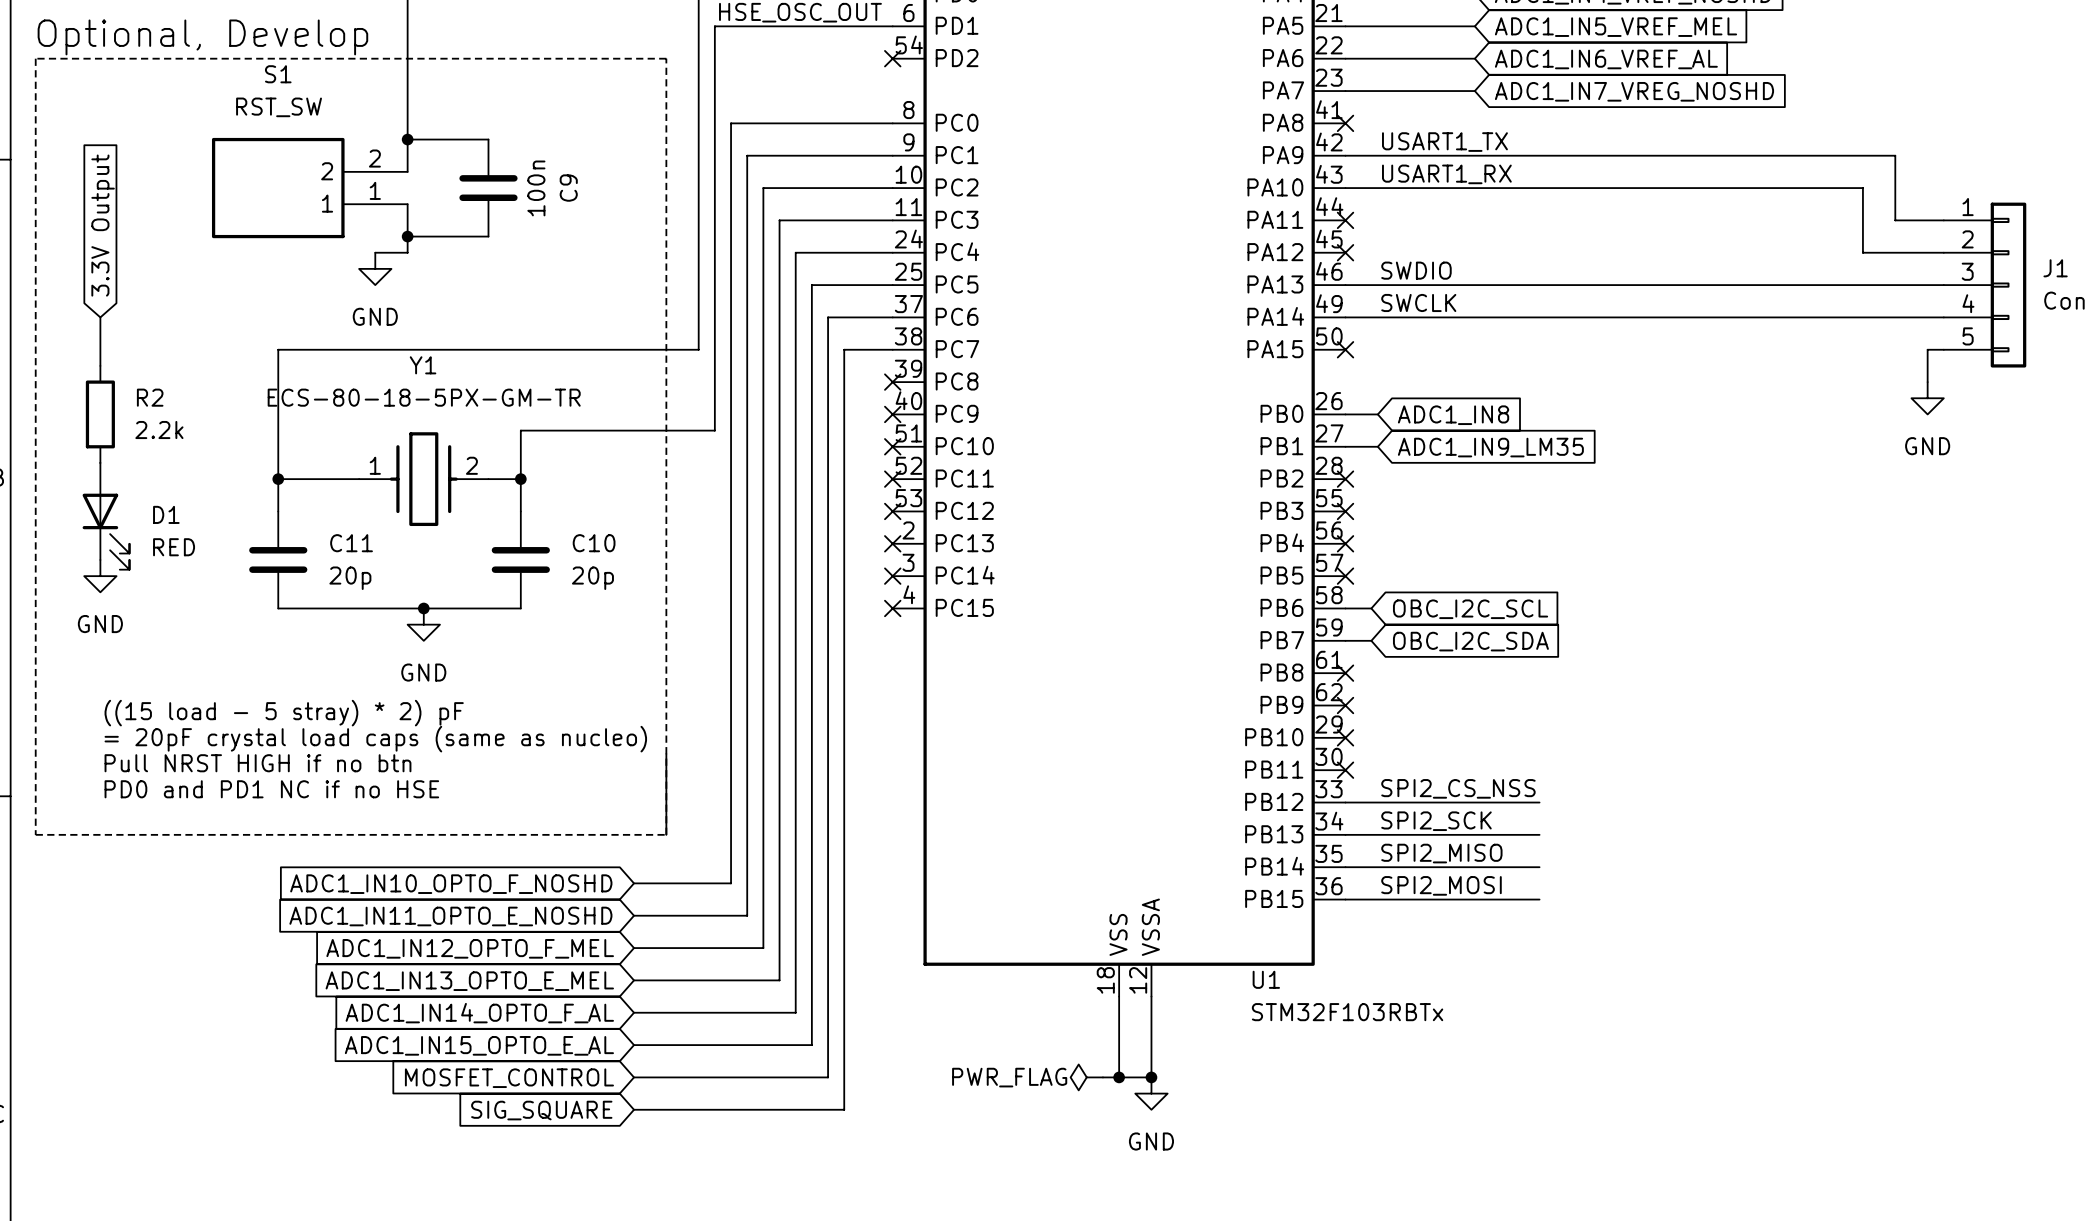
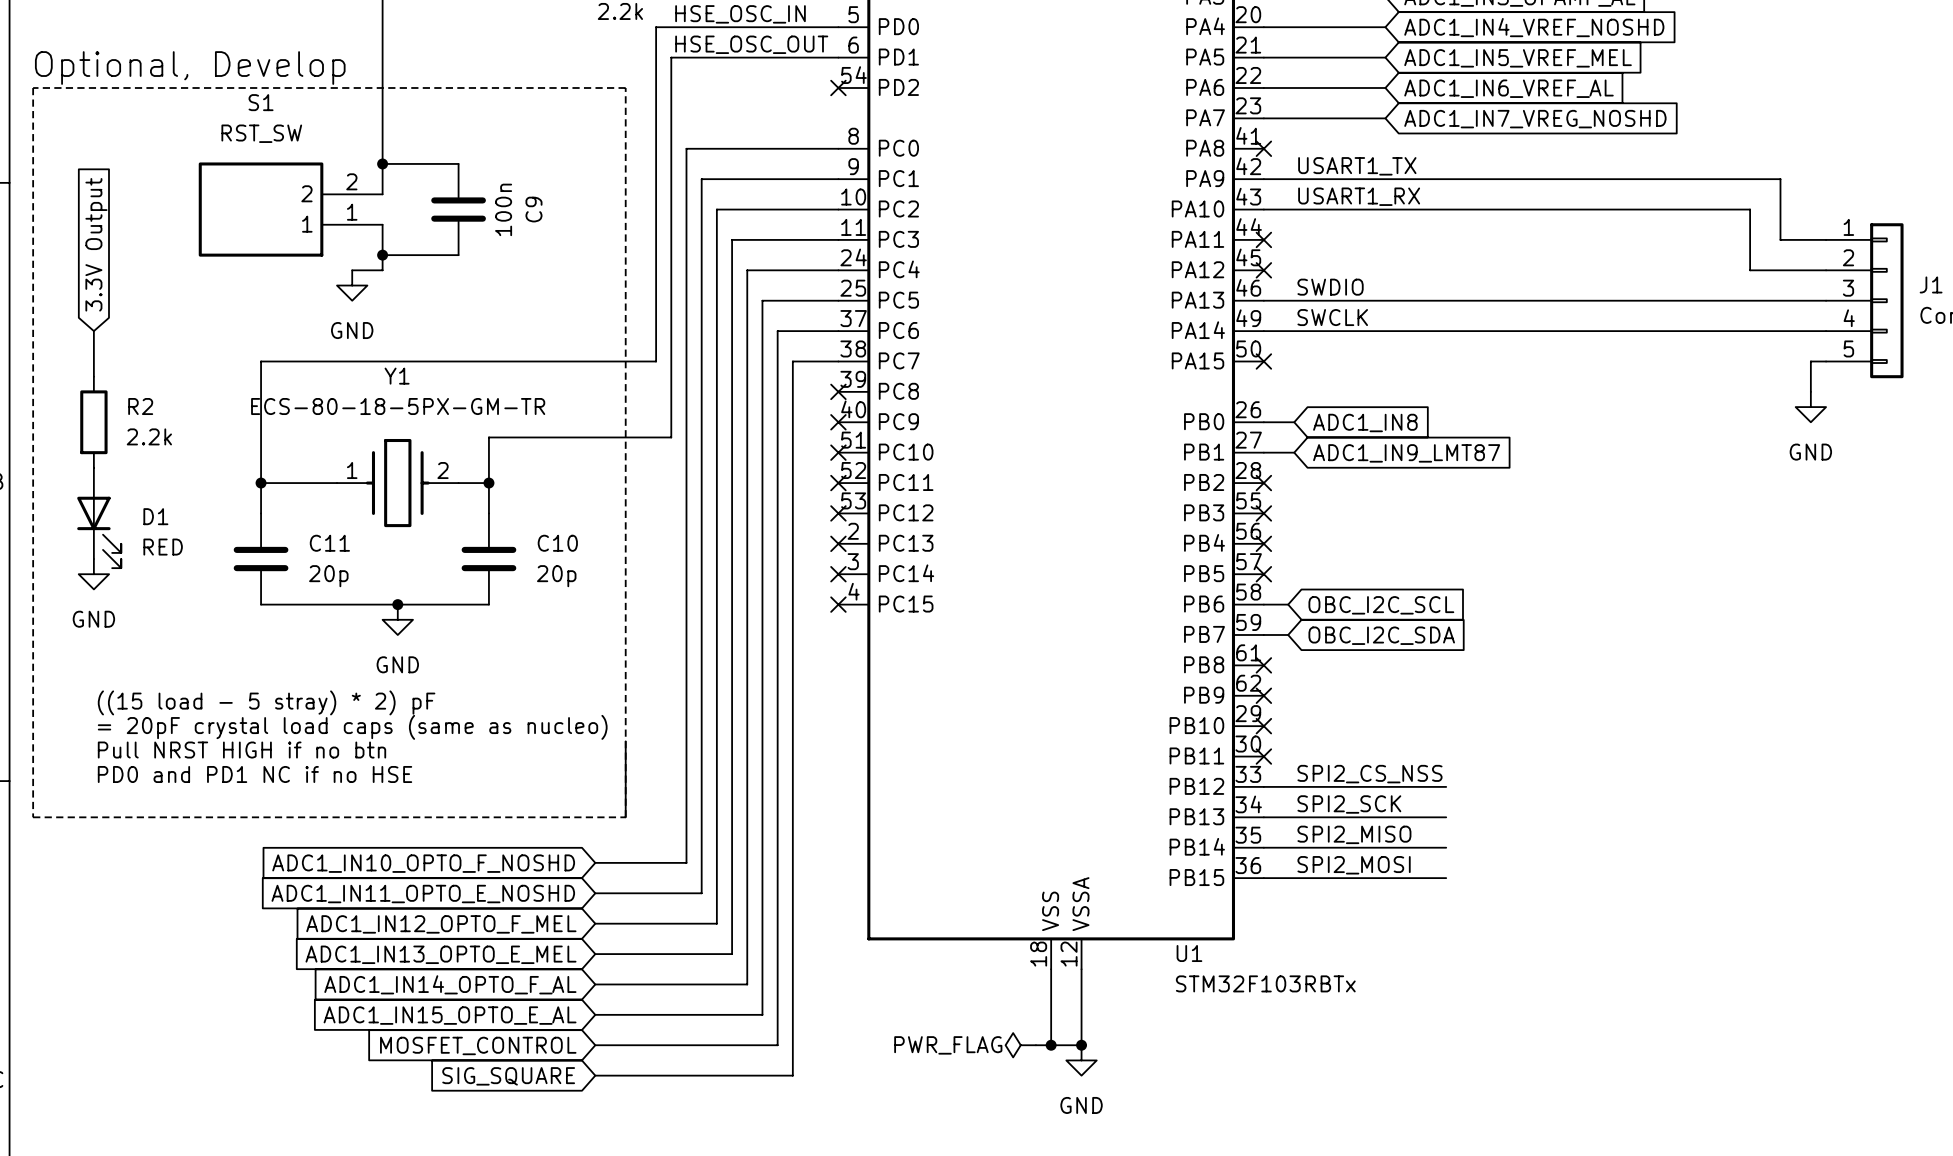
global label: ADC1_IN9_LM35 (1490, 447) -> ADC1_IN9_LMT87 (1406, 453)

